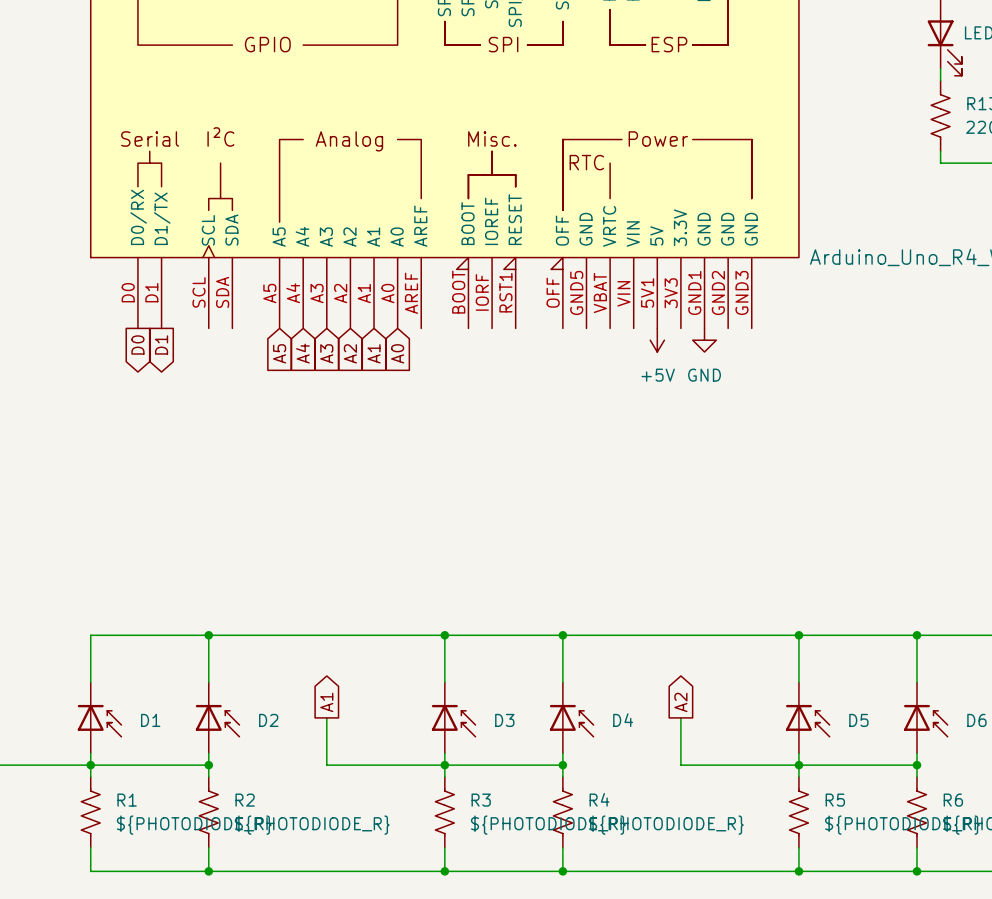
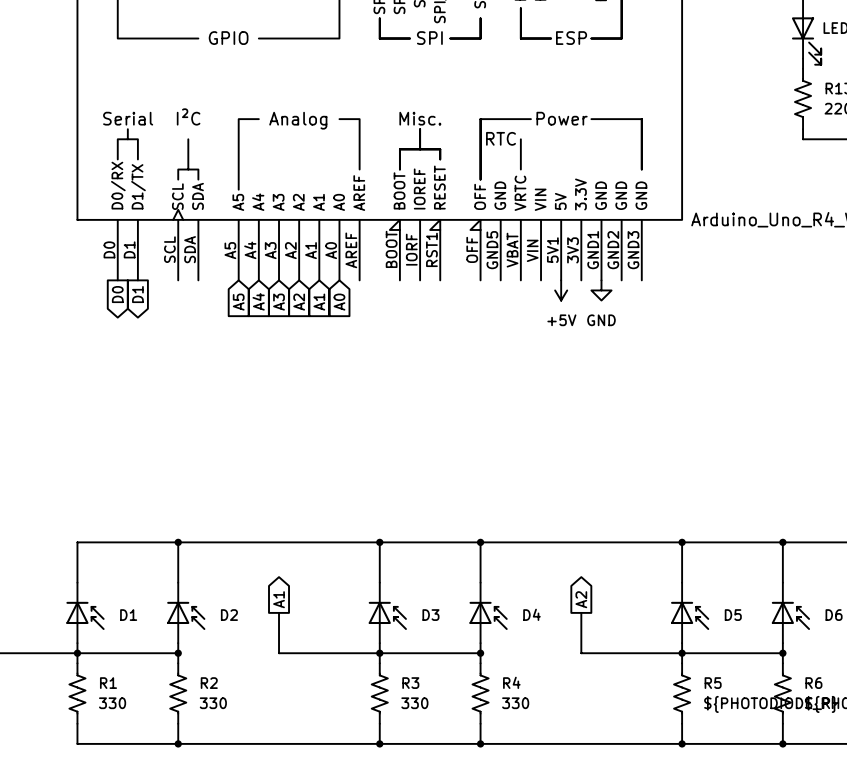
R1 value: ${PHOTODIODE_R} (194, 825) -> 330 (112, 703)
R2 value: ${PHOTODIODE_R} (312, 825) -> 330 (213, 703)
R3 value: ${PHOTODIODE_R} (548, 825) -> 330 (414, 703)
R4 value: ${PHOTODIODE_R} (666, 825) -> 330 (515, 703)

